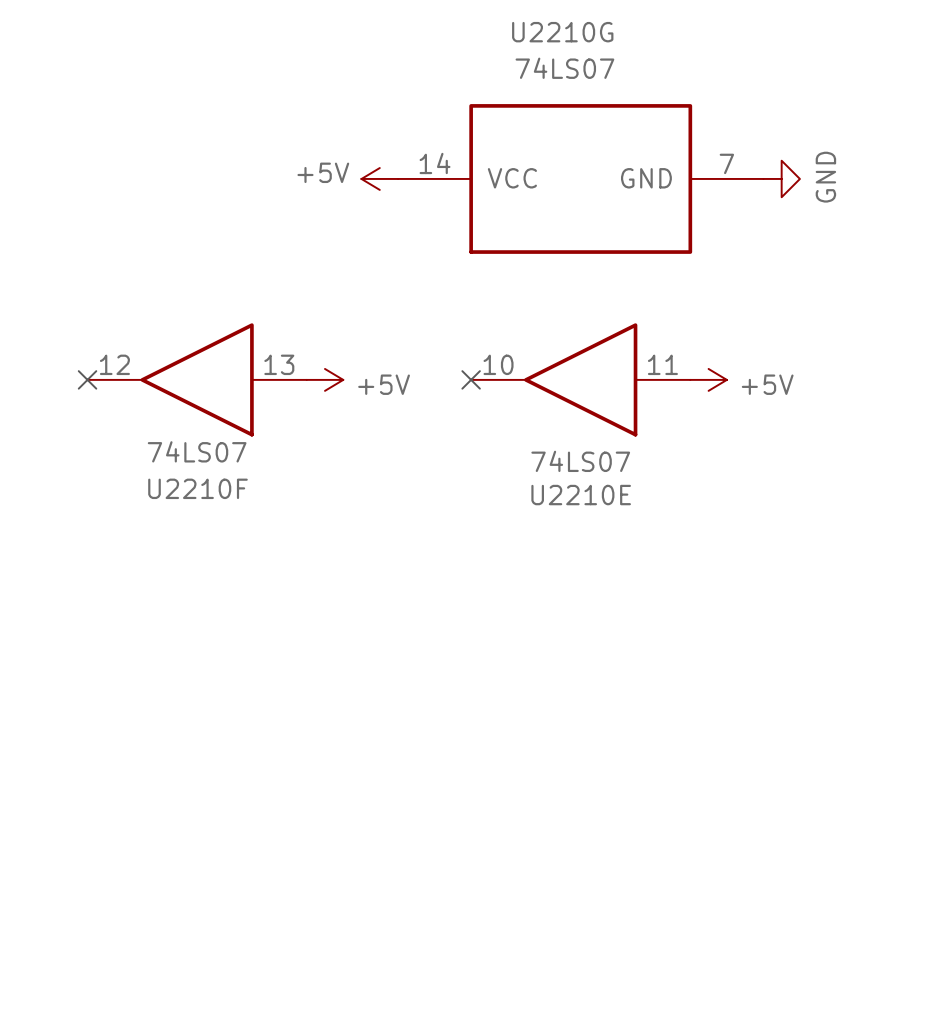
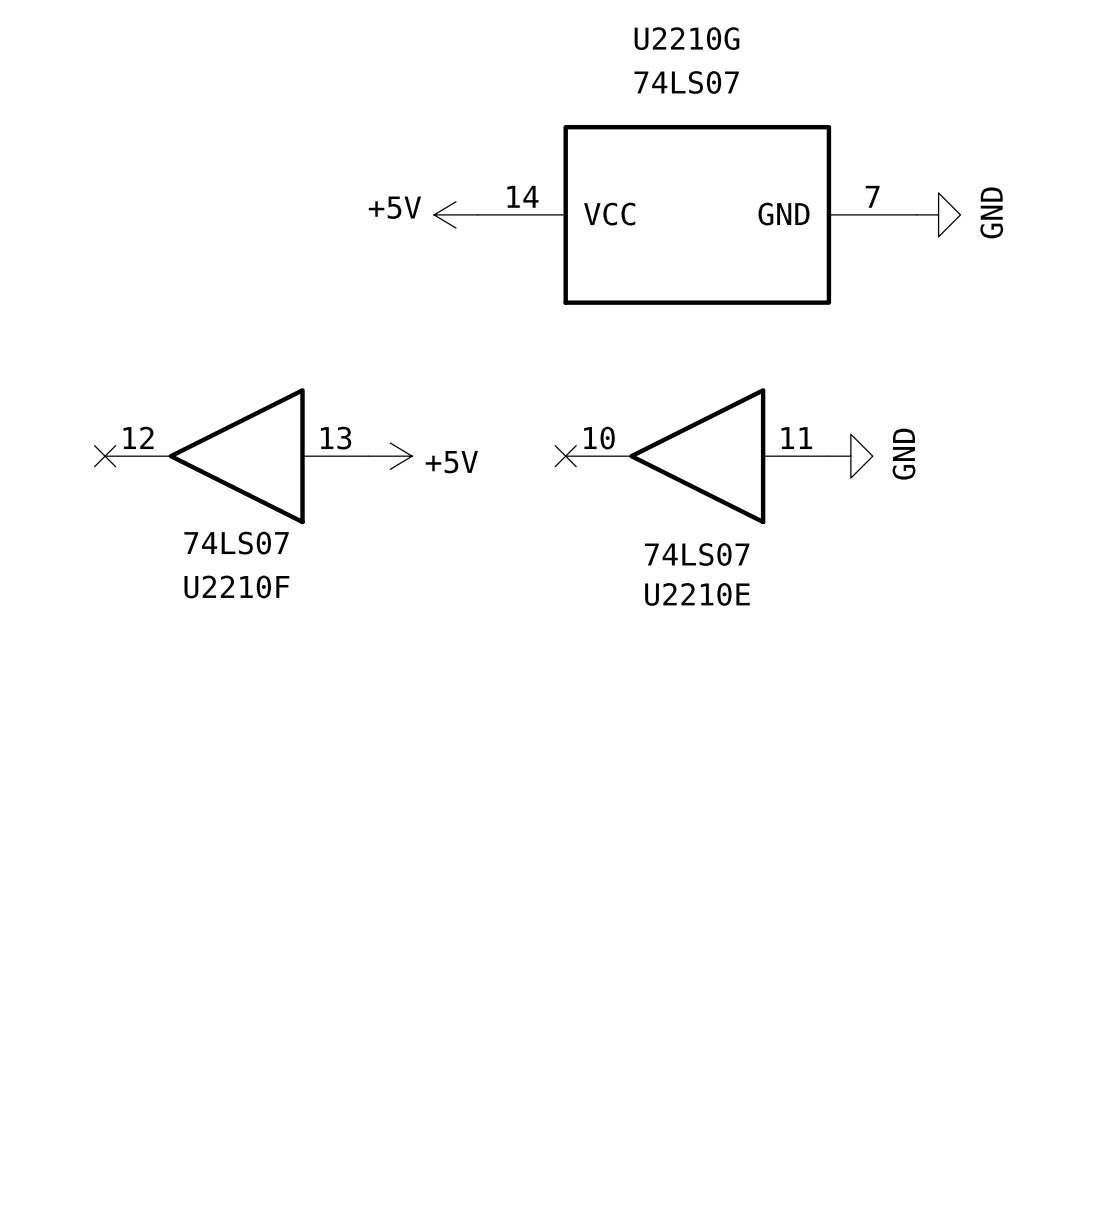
power symbol: +5V (708, 379) -> GND (850, 456)

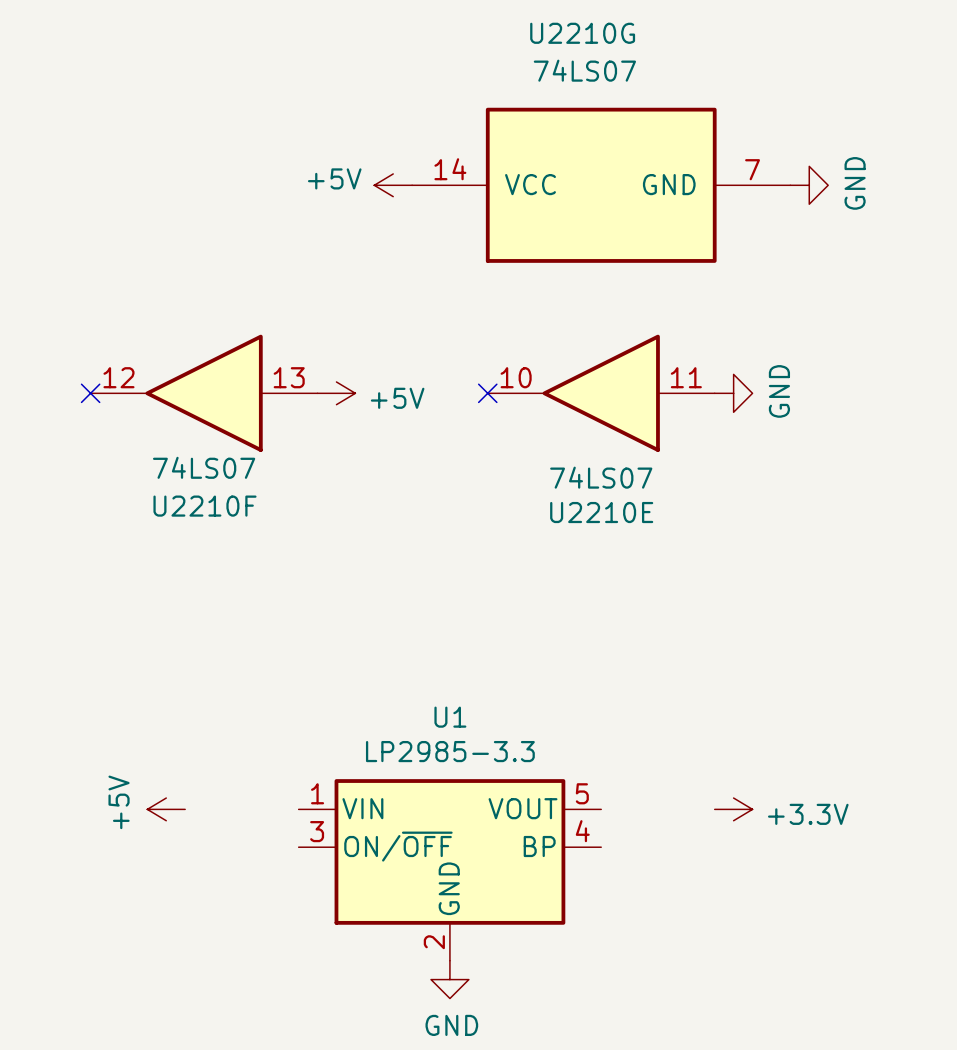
power symbol: none -> +5V (166, 809)
power symbol: none -> +3.3V (733, 809)
U1: none -> LP2985-3.3 (449, 869)
power symbol: none -> GND (449, 979)

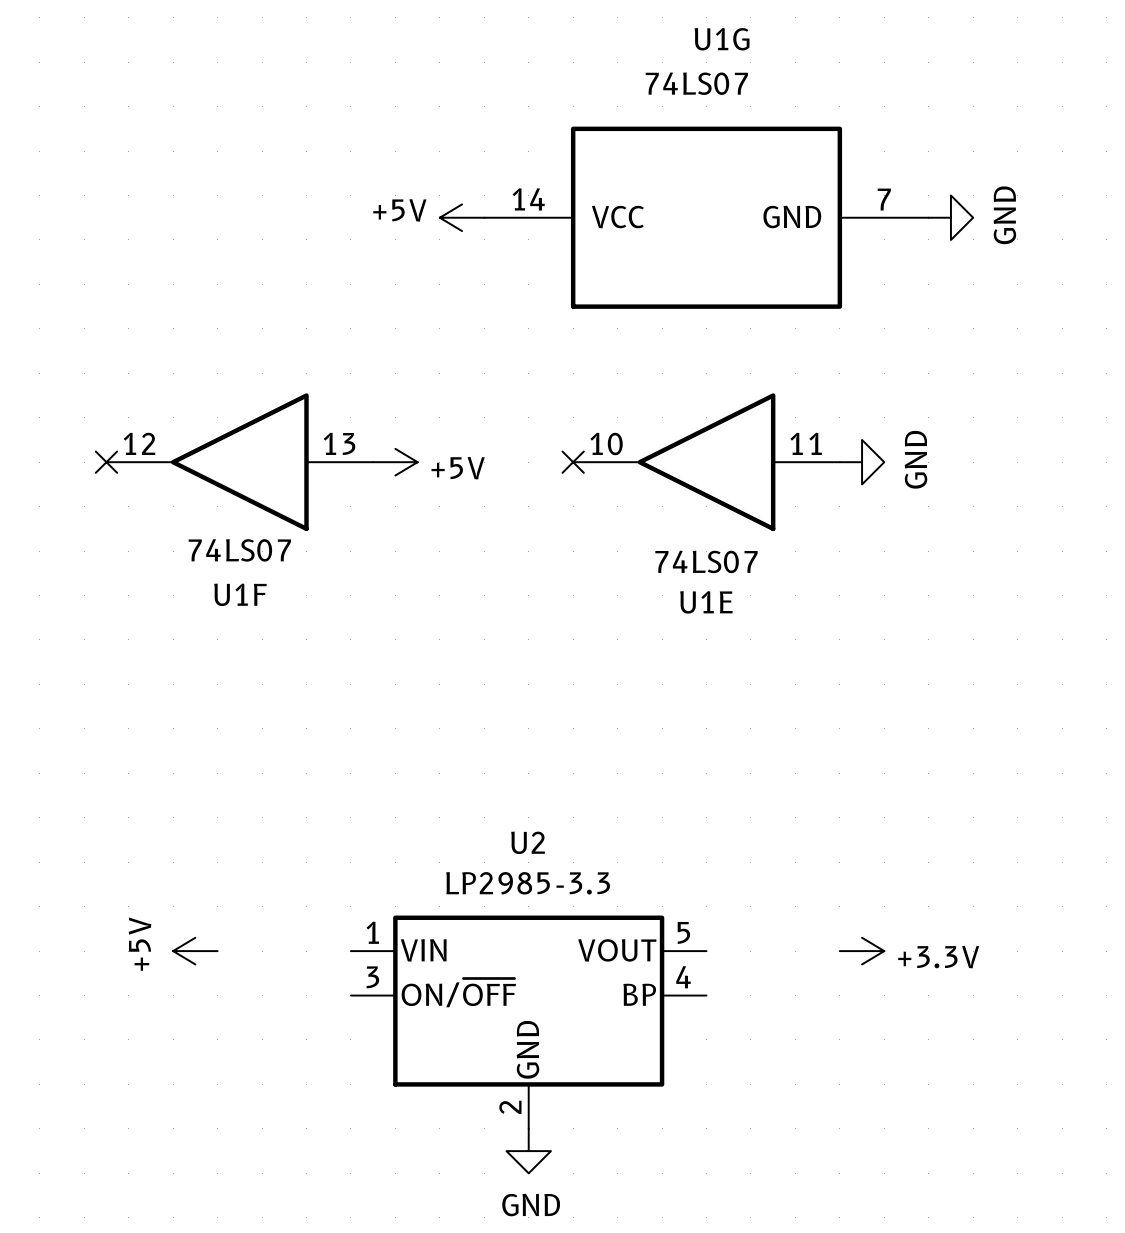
U2210G name: U2210G (582, 33) -> U1G (722, 39)
U2210F name: U2210F (204, 506) -> U1F (240, 594)
U2210E name: U2210E (601, 512) -> U1E (706, 602)
U1 name: U1 (450, 717) -> U2 (528, 842)

